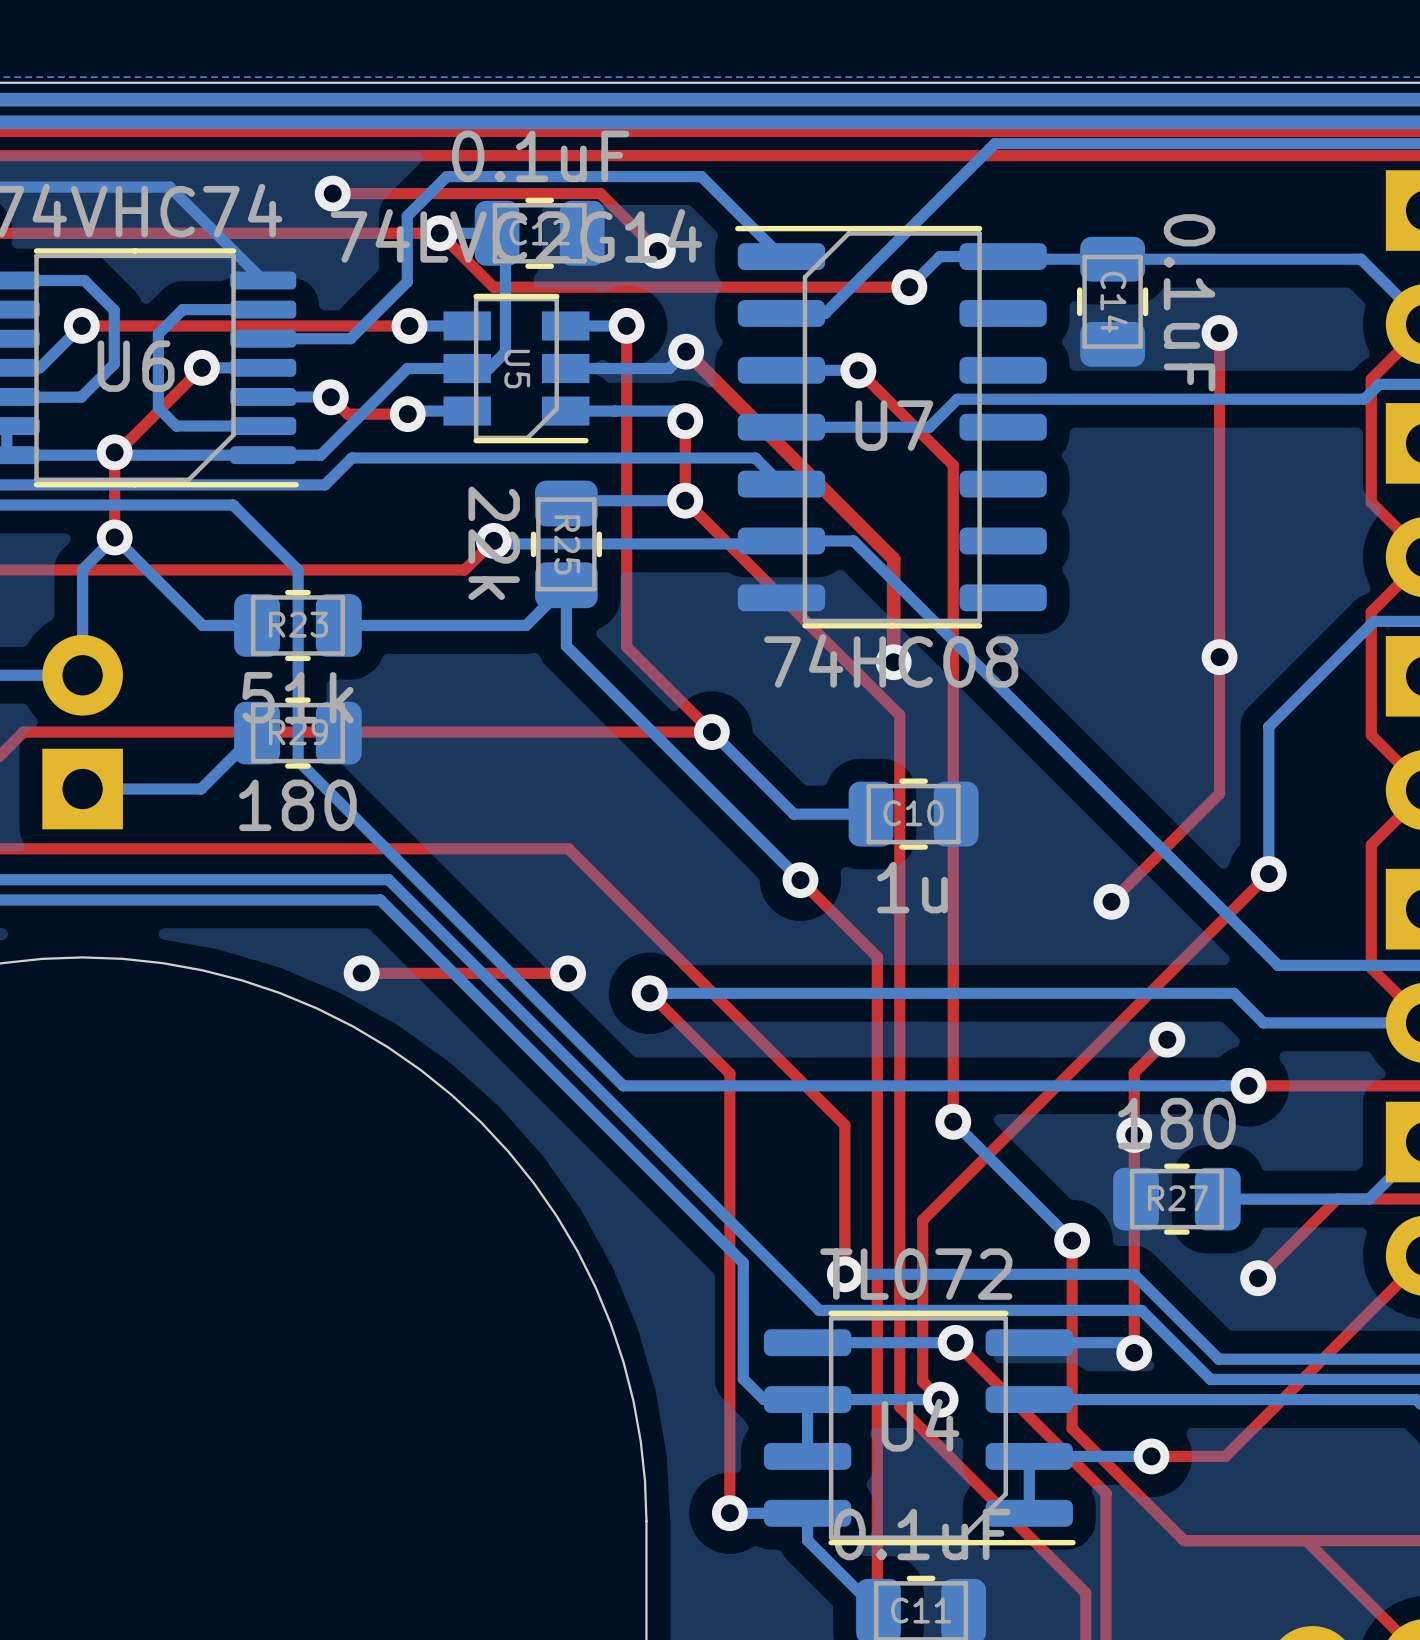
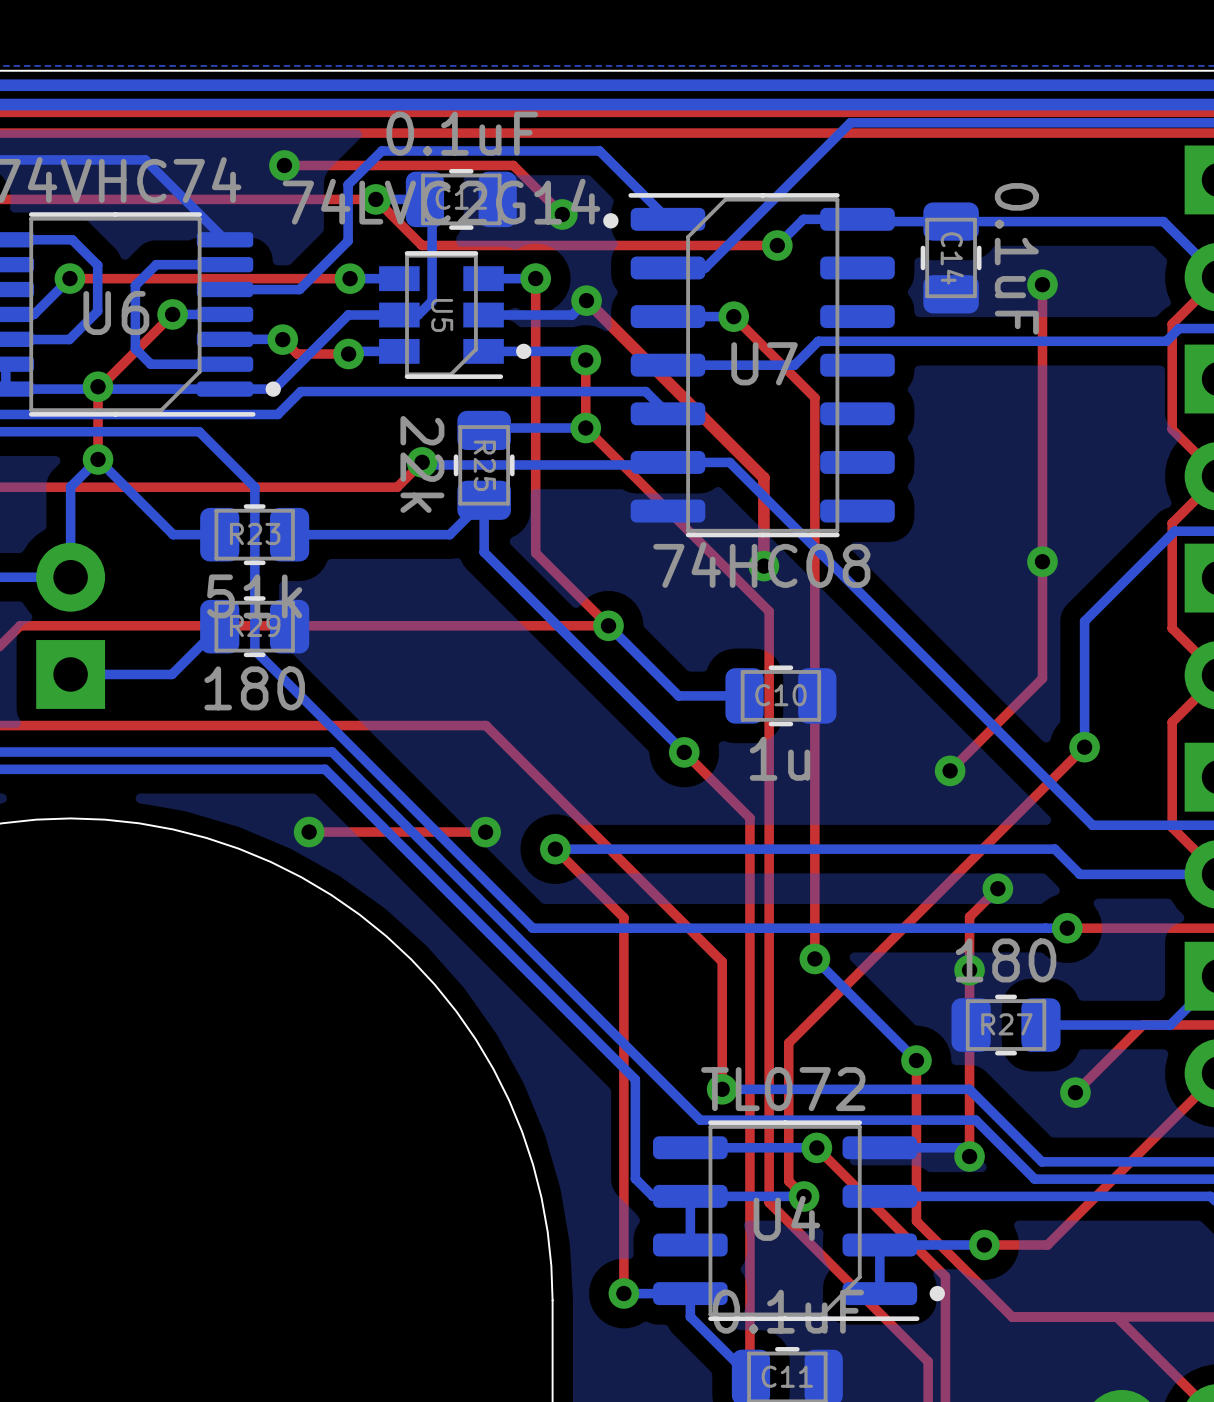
drawing: none -> [603, 213, 619, 229]
drawing: none -> [516, 343, 532, 360]
drawing: none -> [265, 381, 281, 397]
drawing: none -> [929, 1285, 945, 1302]

